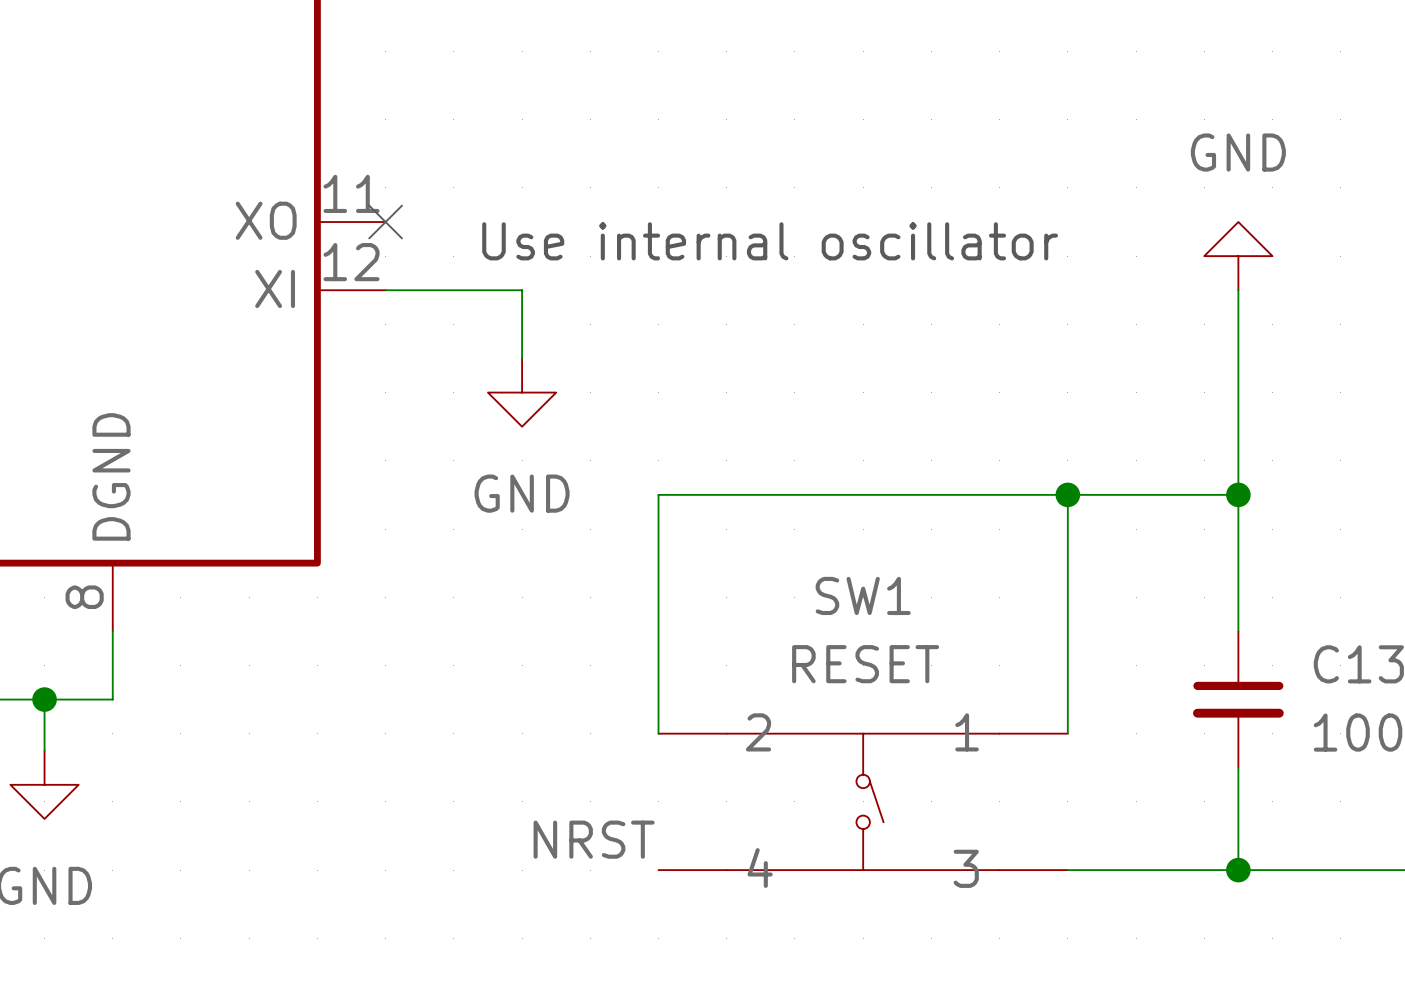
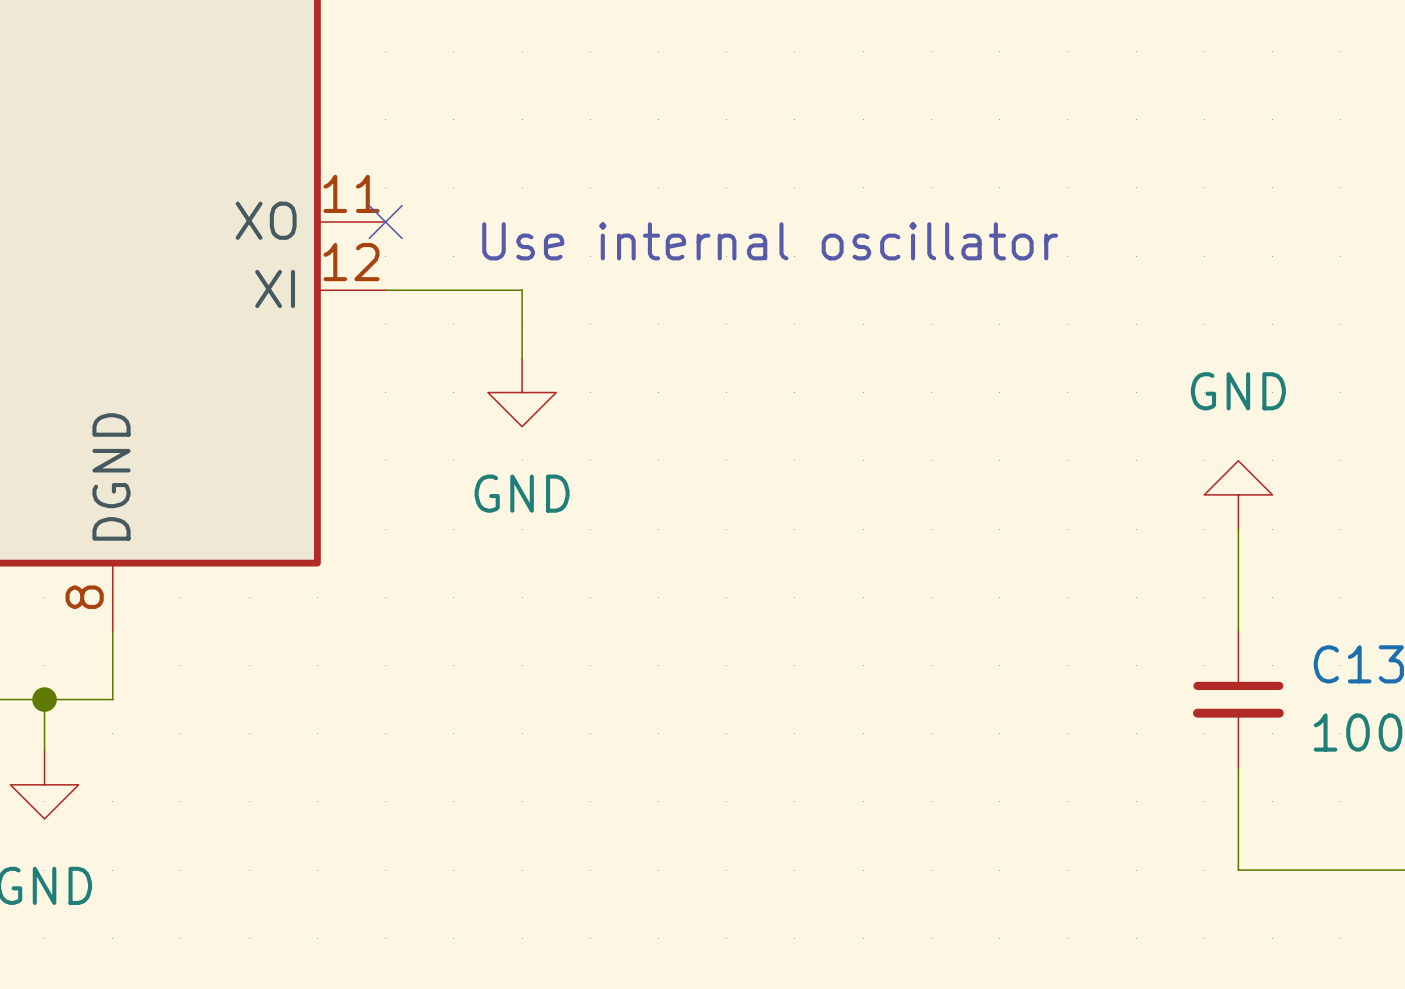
power symbol position: GND (1238, 256) -> GND (1238, 494)
wire: (1238, 290) (1238, 529) -> none
wire: (1067, 494) (1067, 733) -> none
junction: (1067, 494) -> none
wire: (1238, 494) (658, 494) (658, 733) -> none
junction: (1238, 494) -> none
SW1: RESET (863, 801) -> none
label: NRST (594, 839) -> none
wire: (1067, 870) (1238, 870) -> none
junction: (1238, 870) -> none

